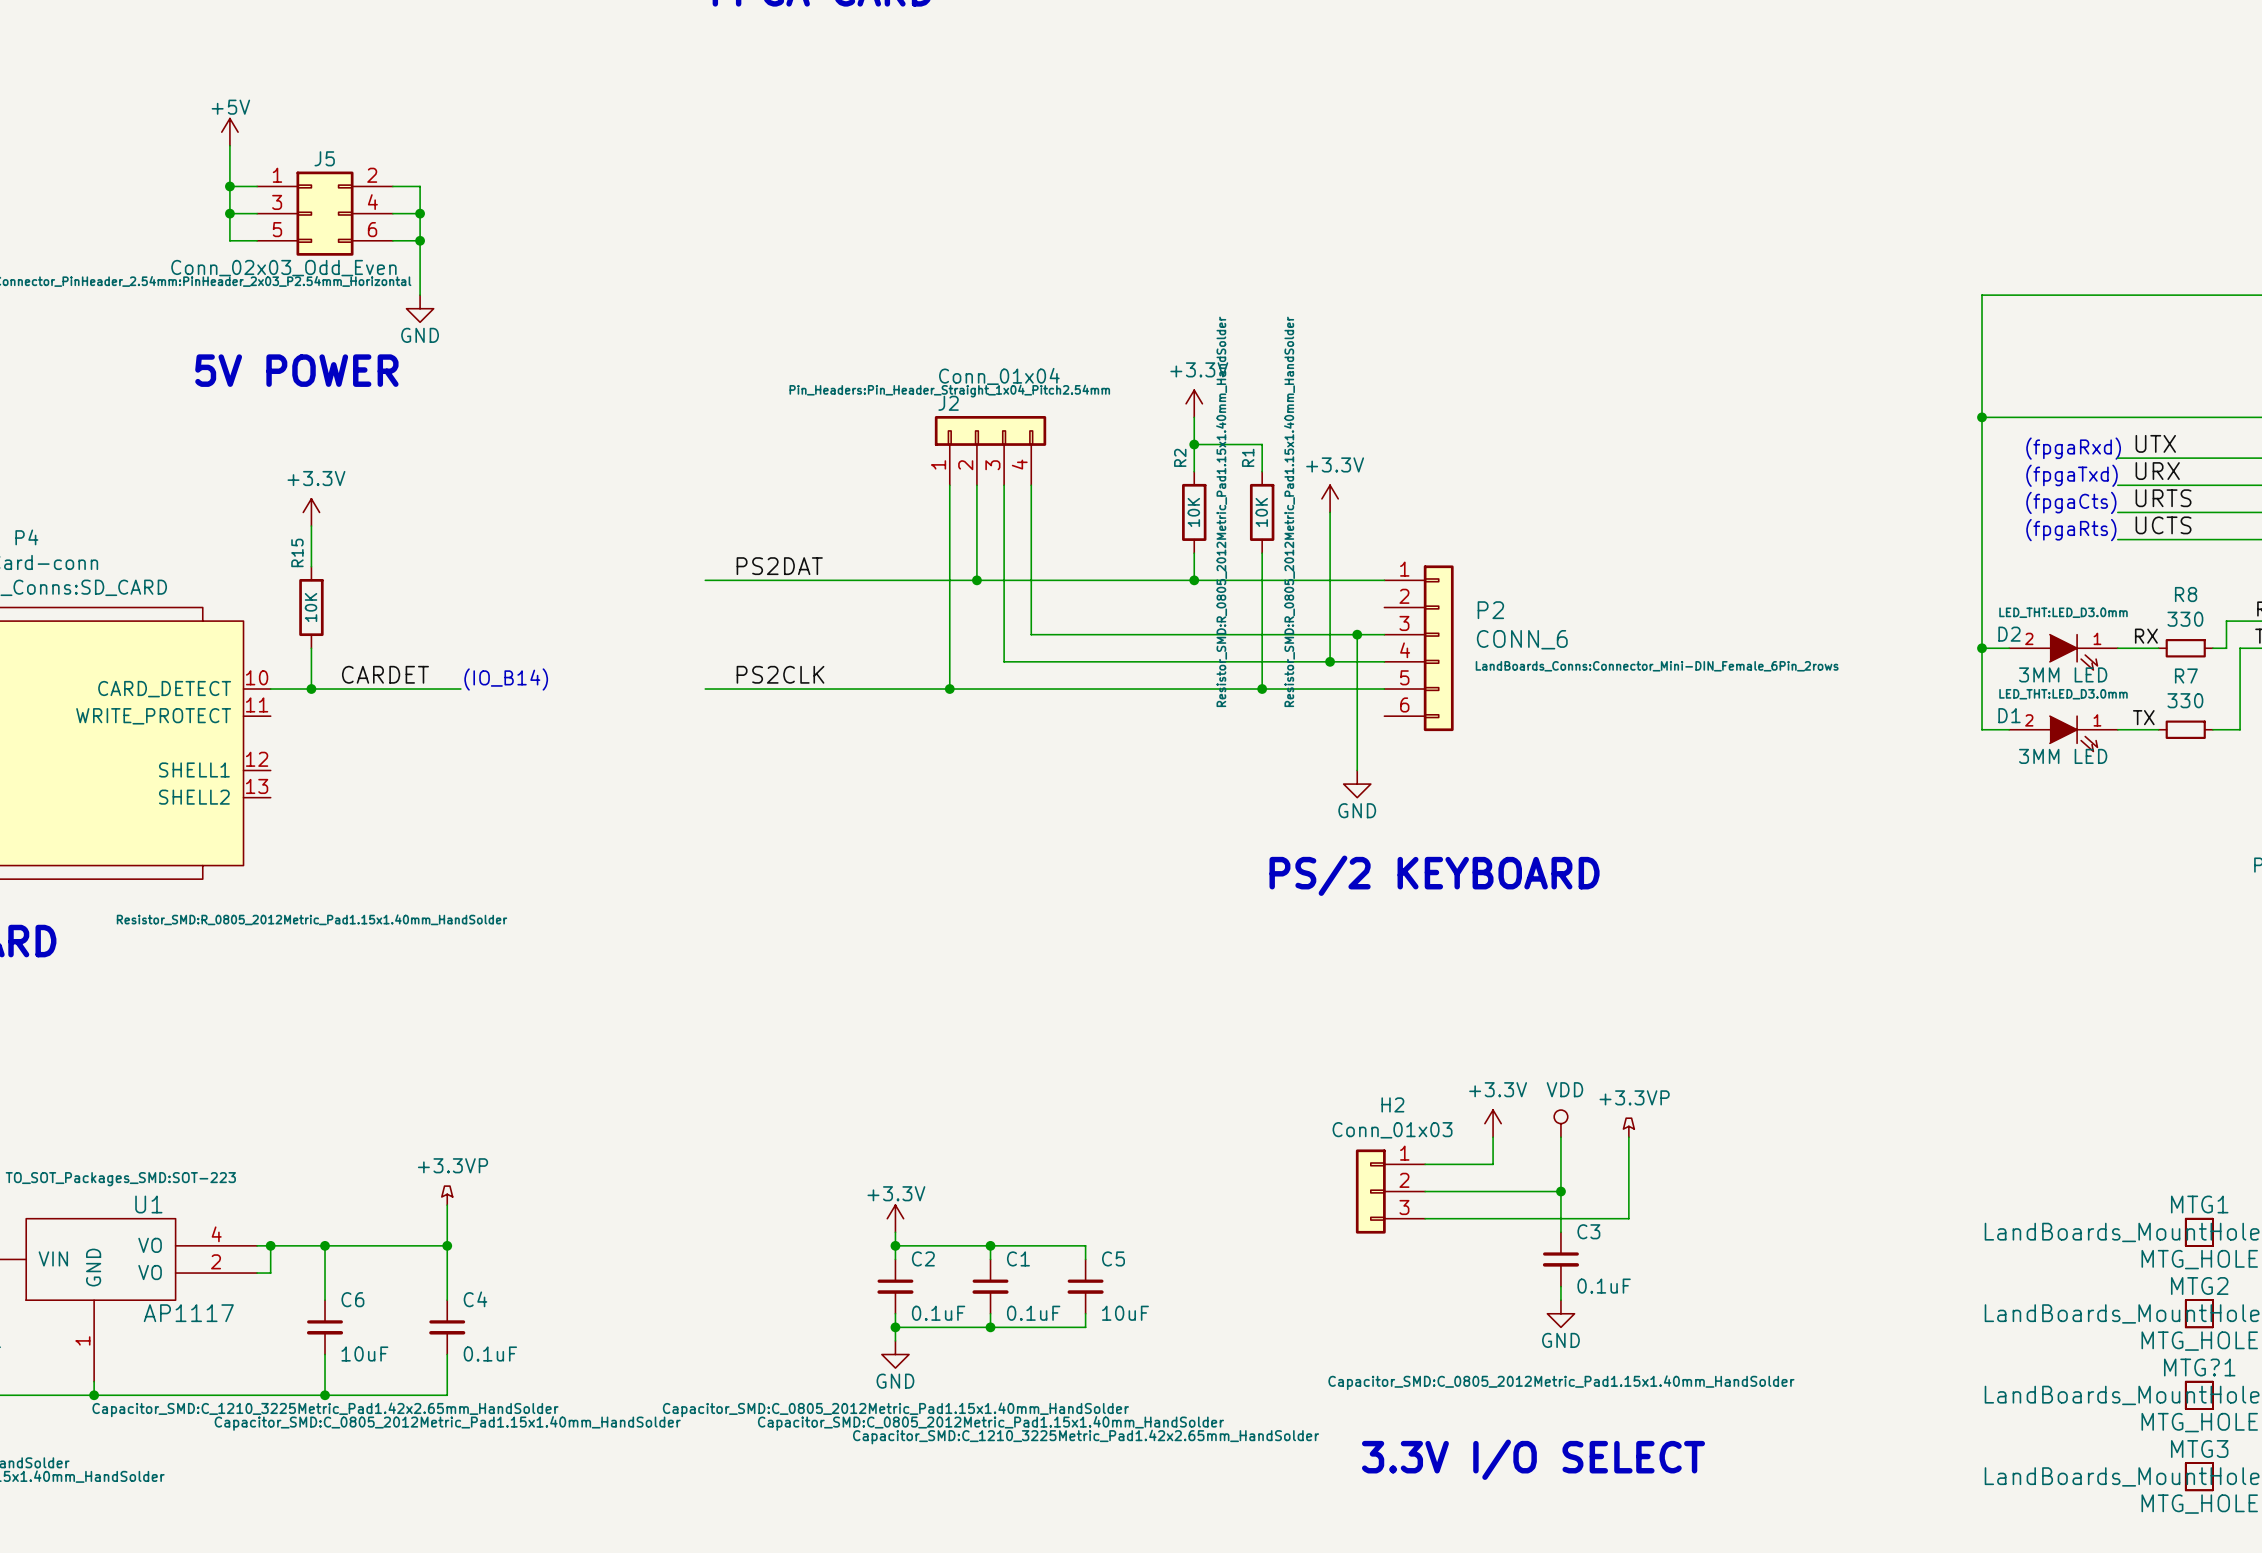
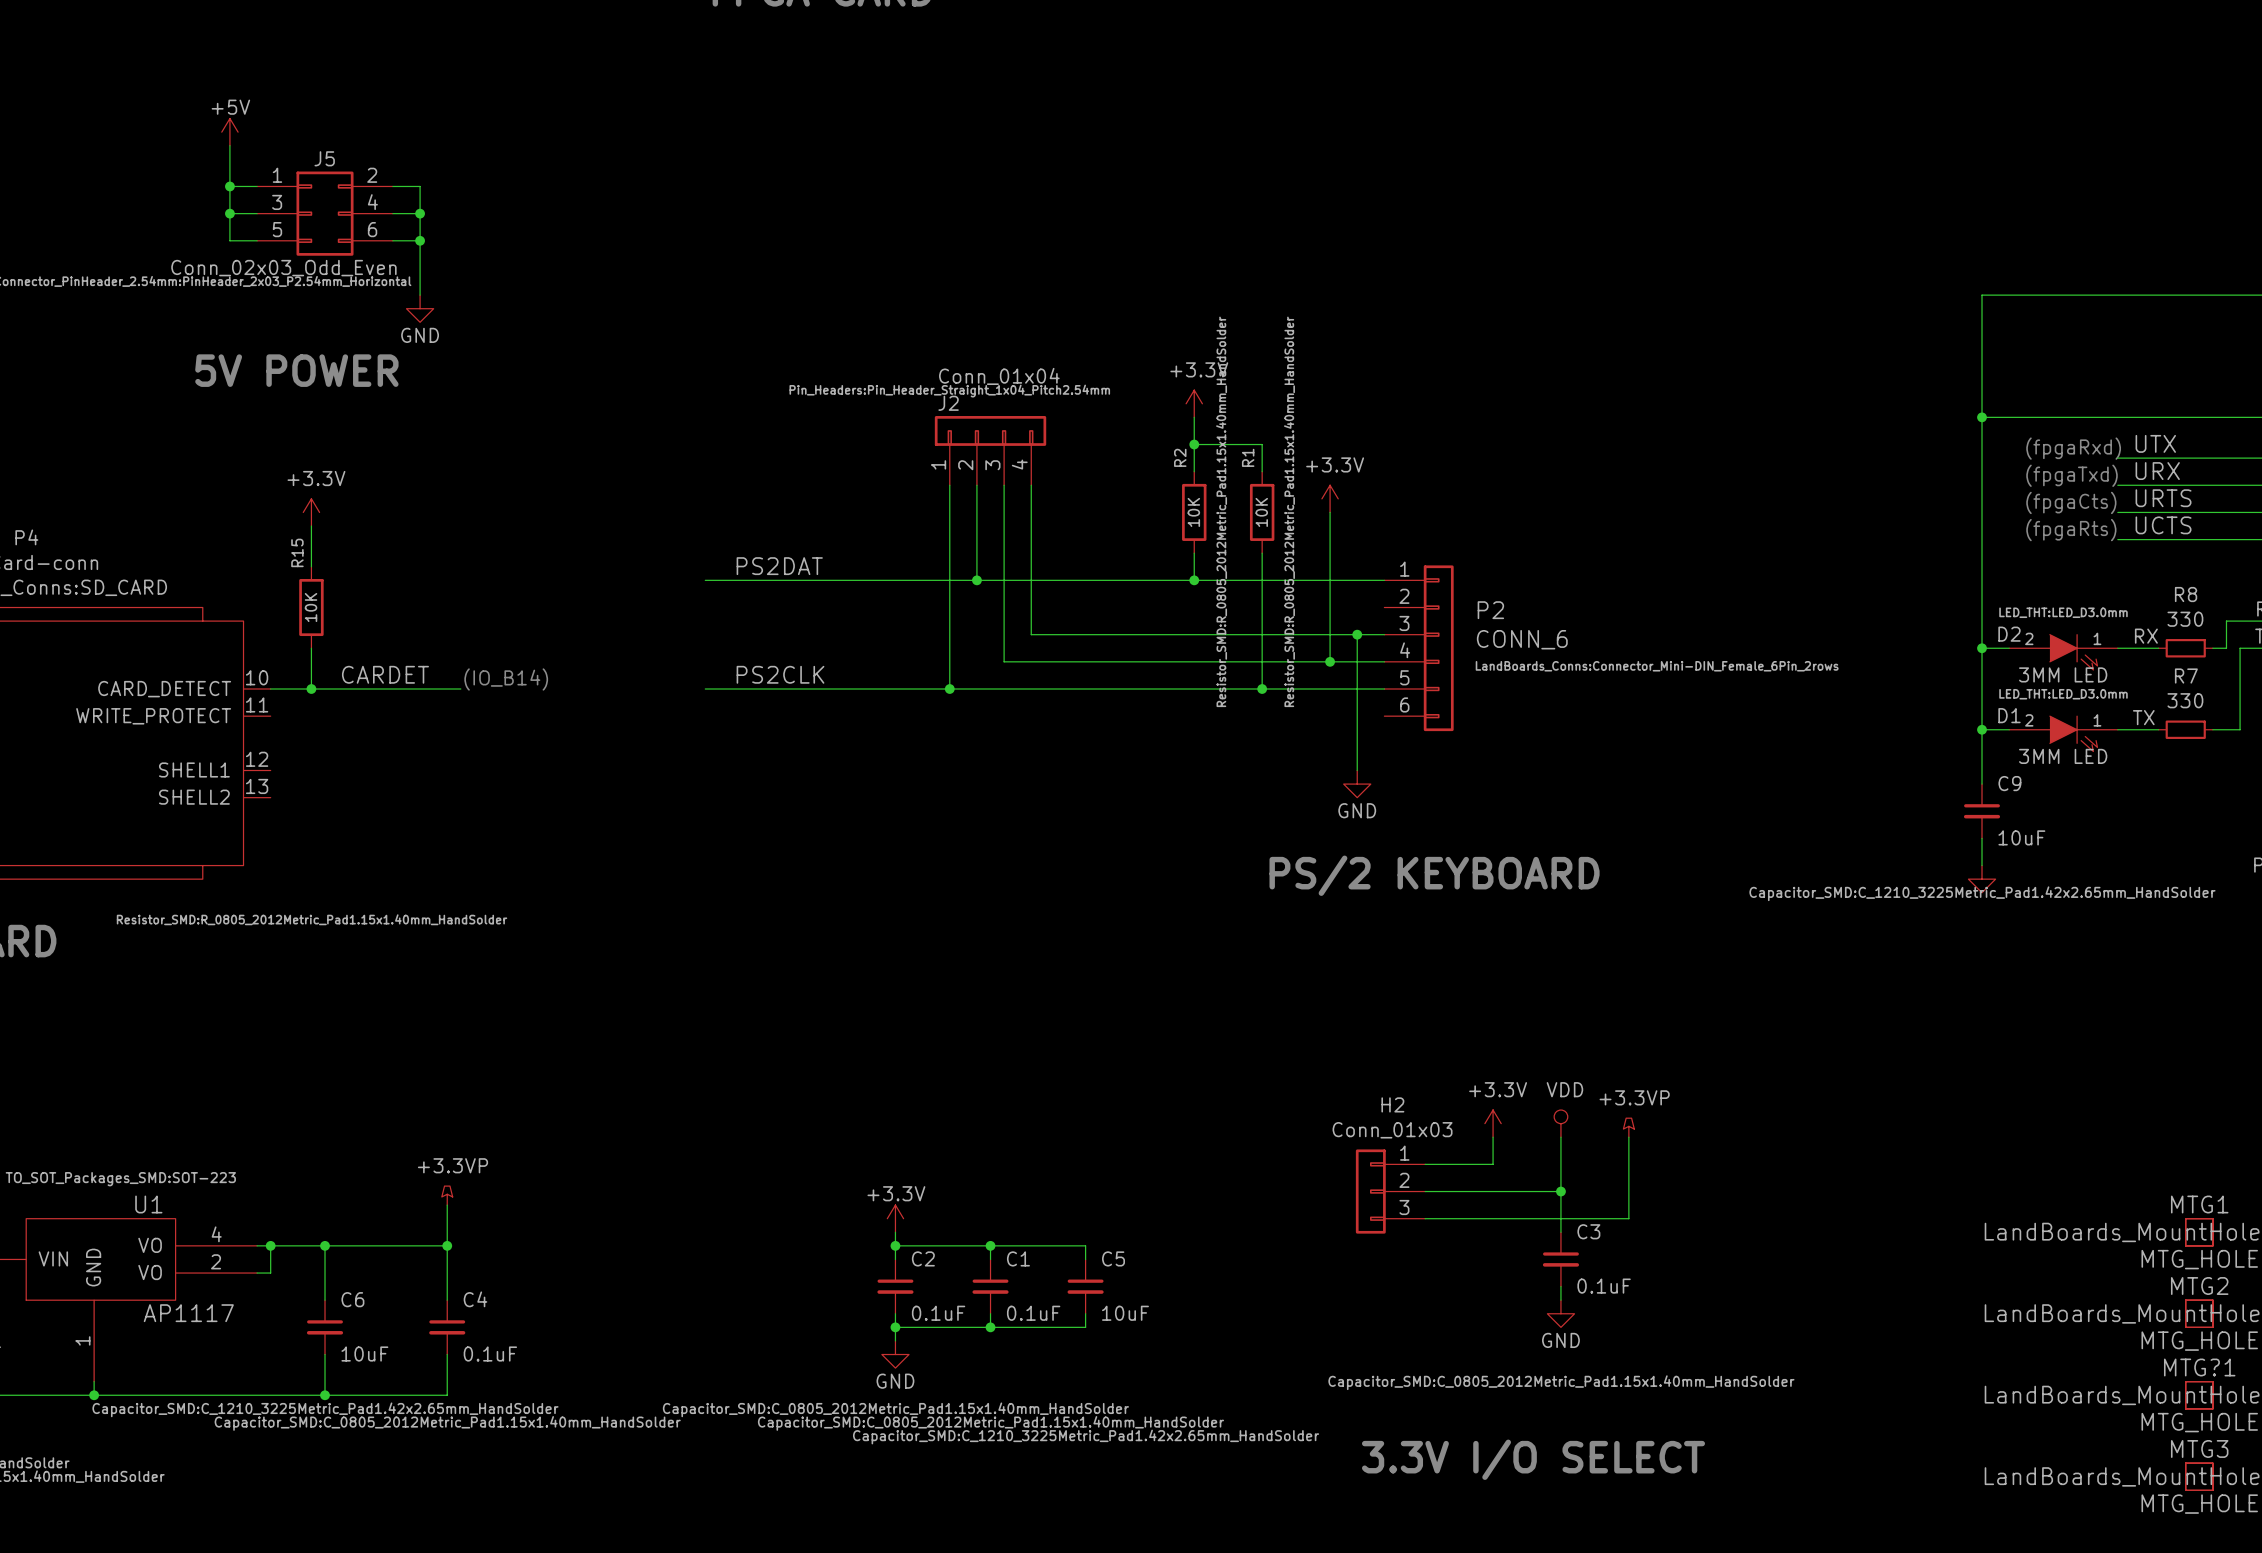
wire: none -> (1982, 729) (1982, 784)
junction: none -> (1982, 729)
C9: none -> 10uF (1982, 811)
wire: none -> (1982, 838) (1982, 865)
power symbol: none -> (1982, 879)

